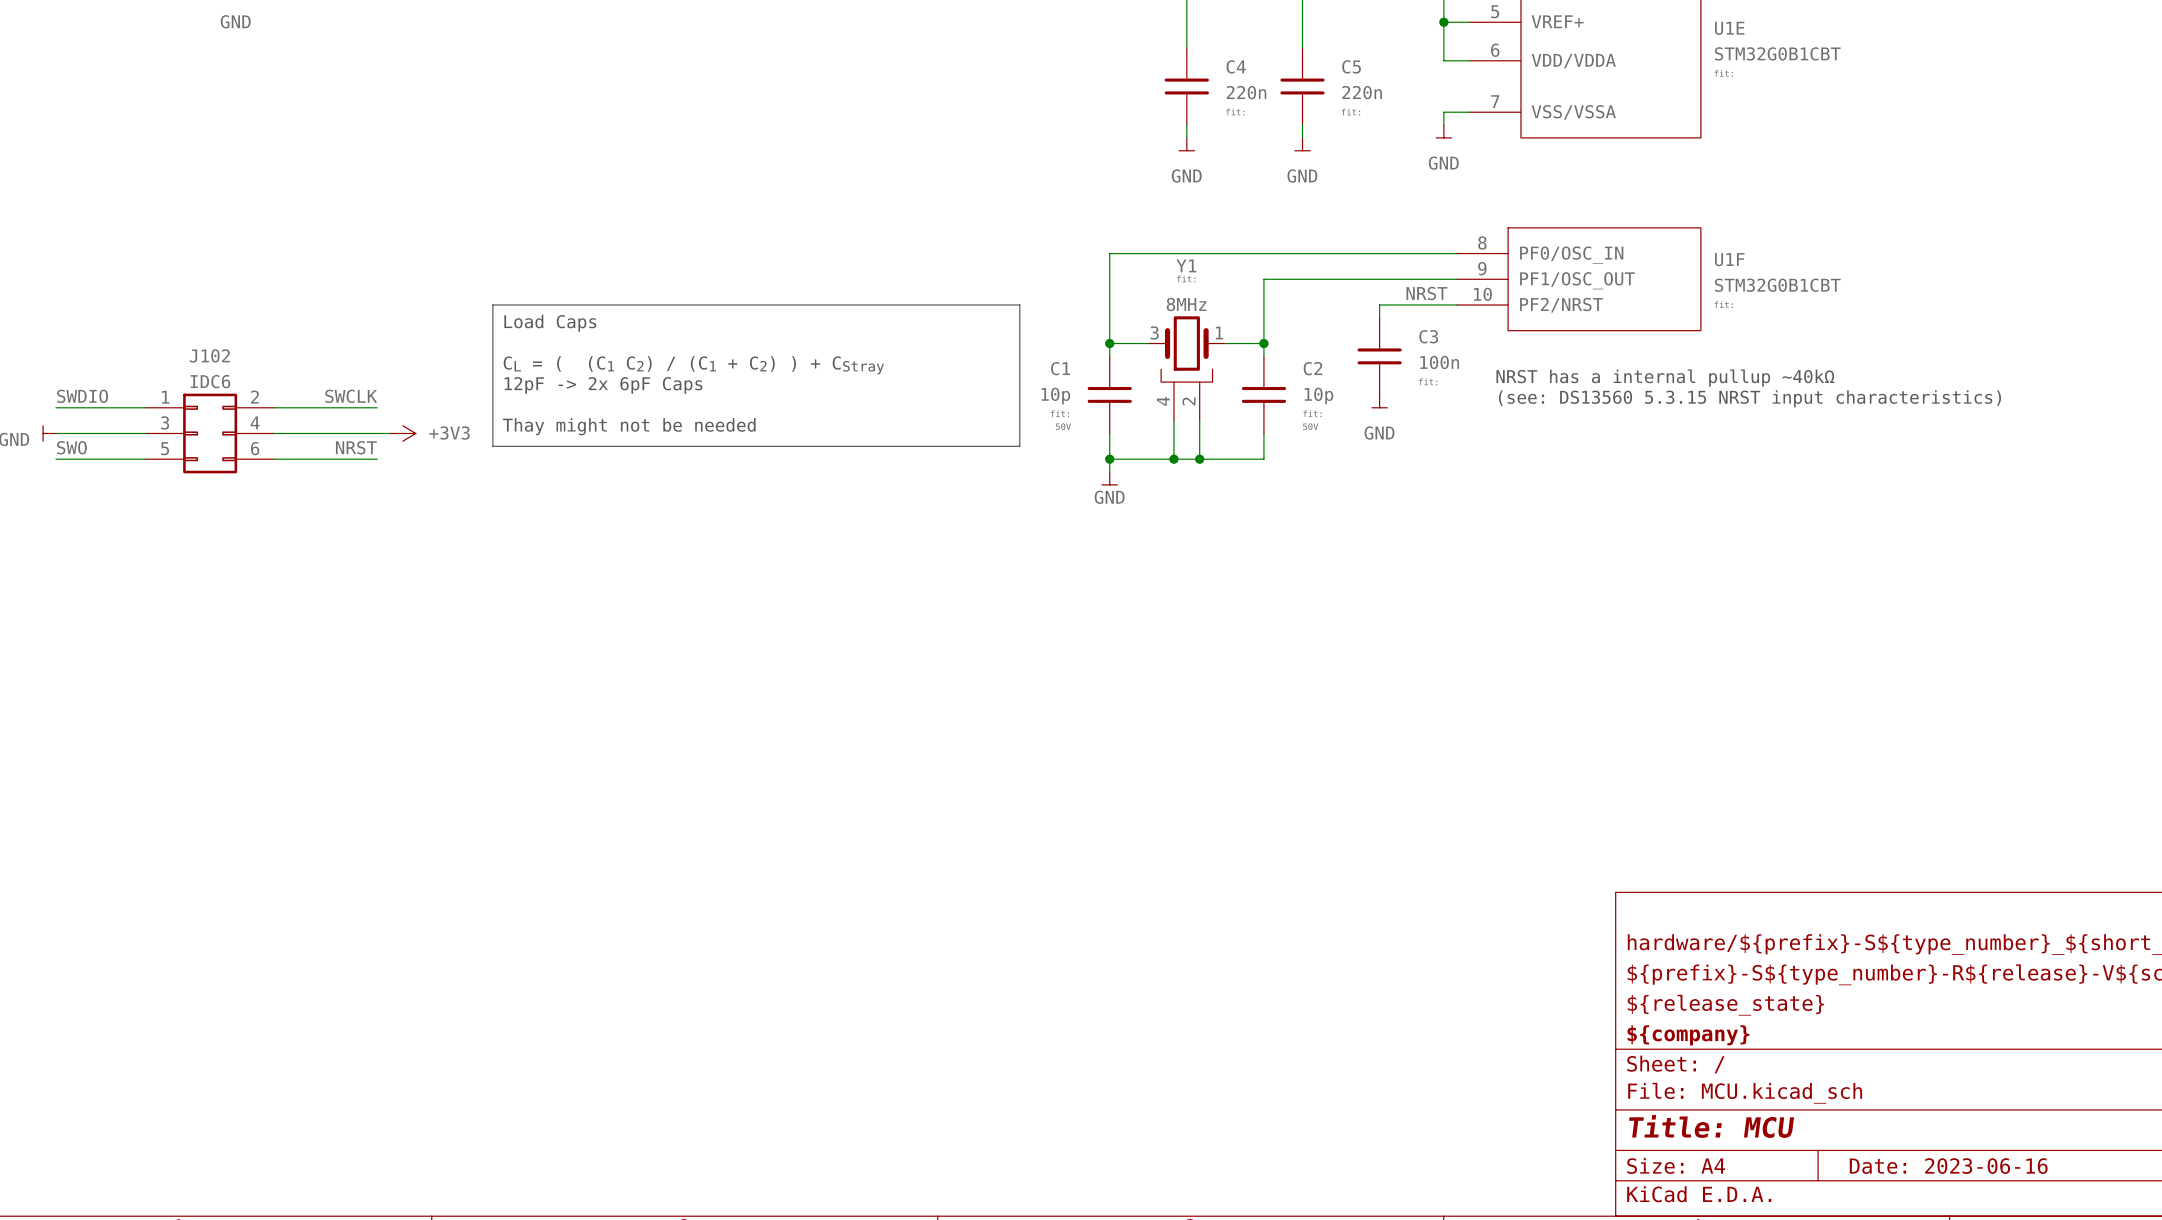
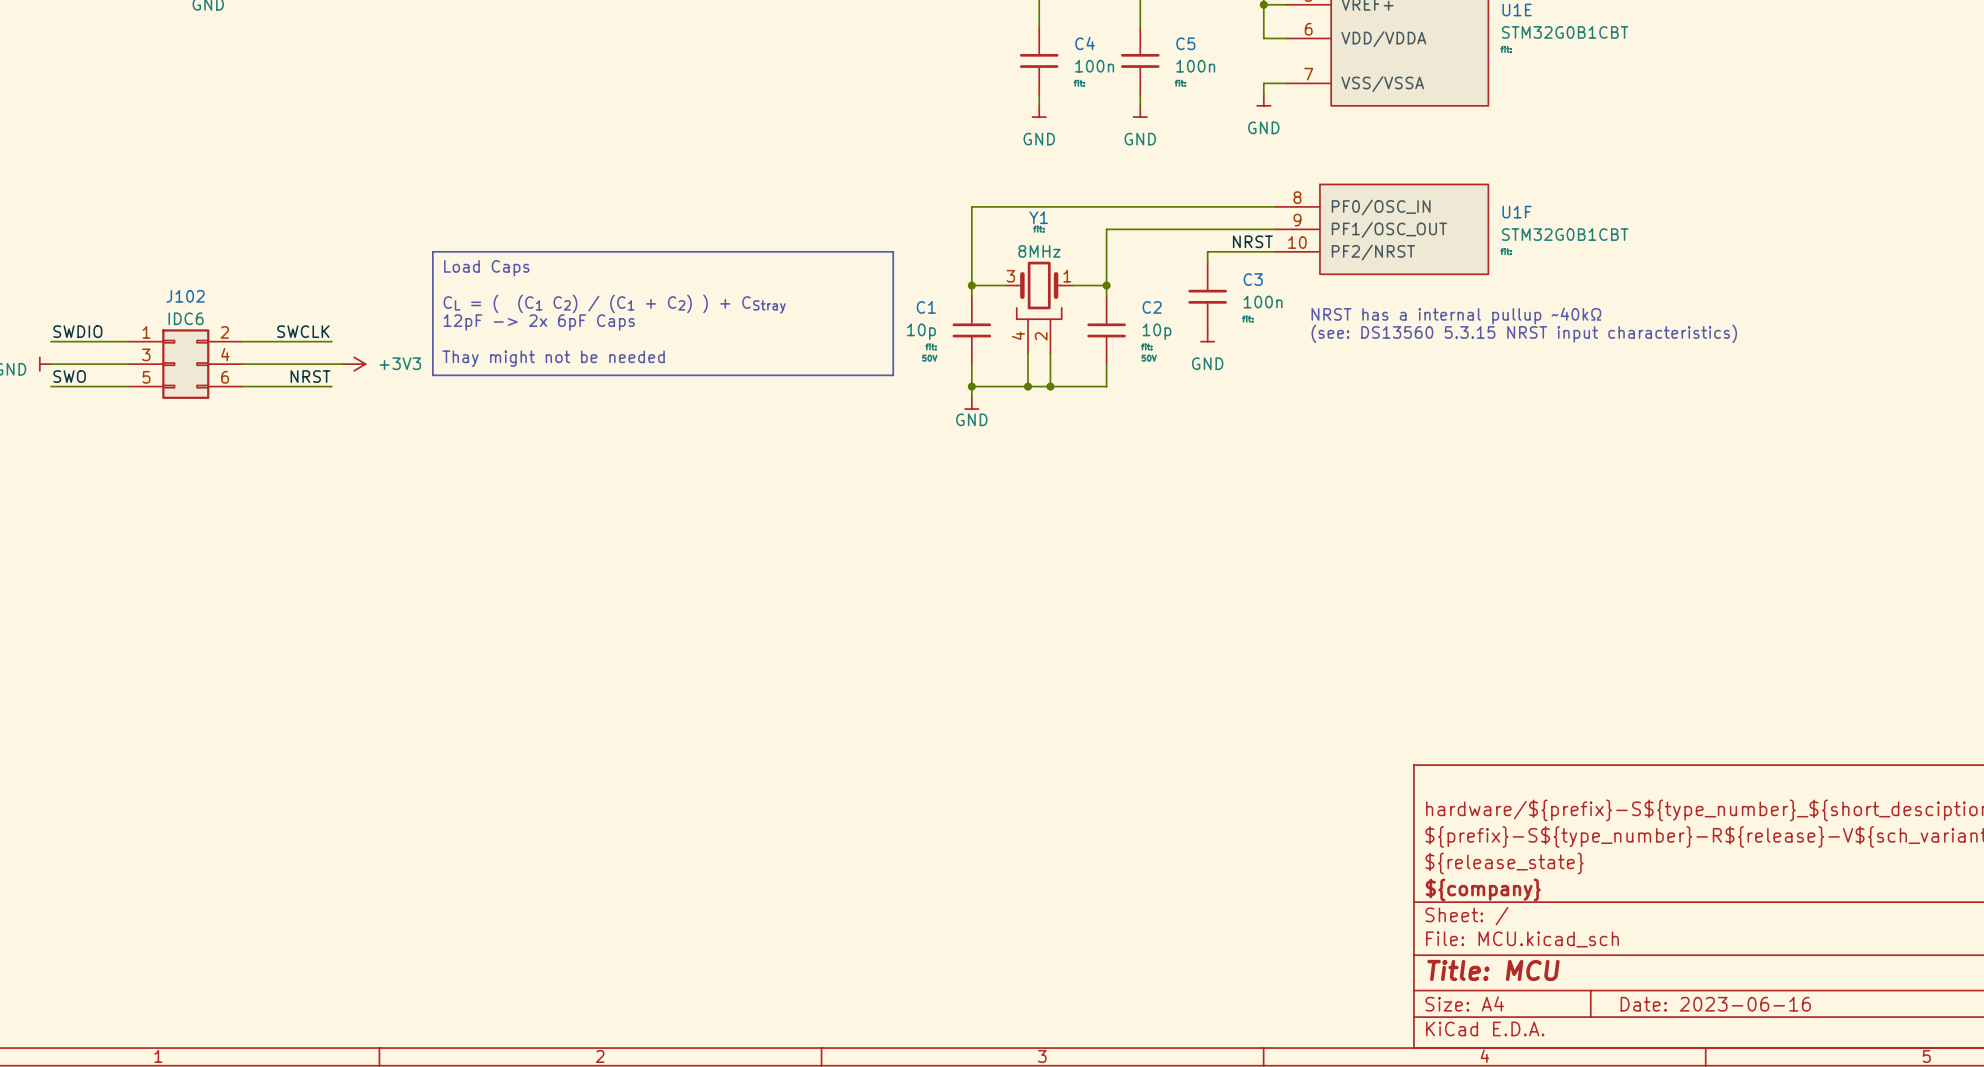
C4 value: 220n (1246, 92) -> 100n (1094, 66)
C5 value: 220n (1362, 92) -> 100n (1195, 66)

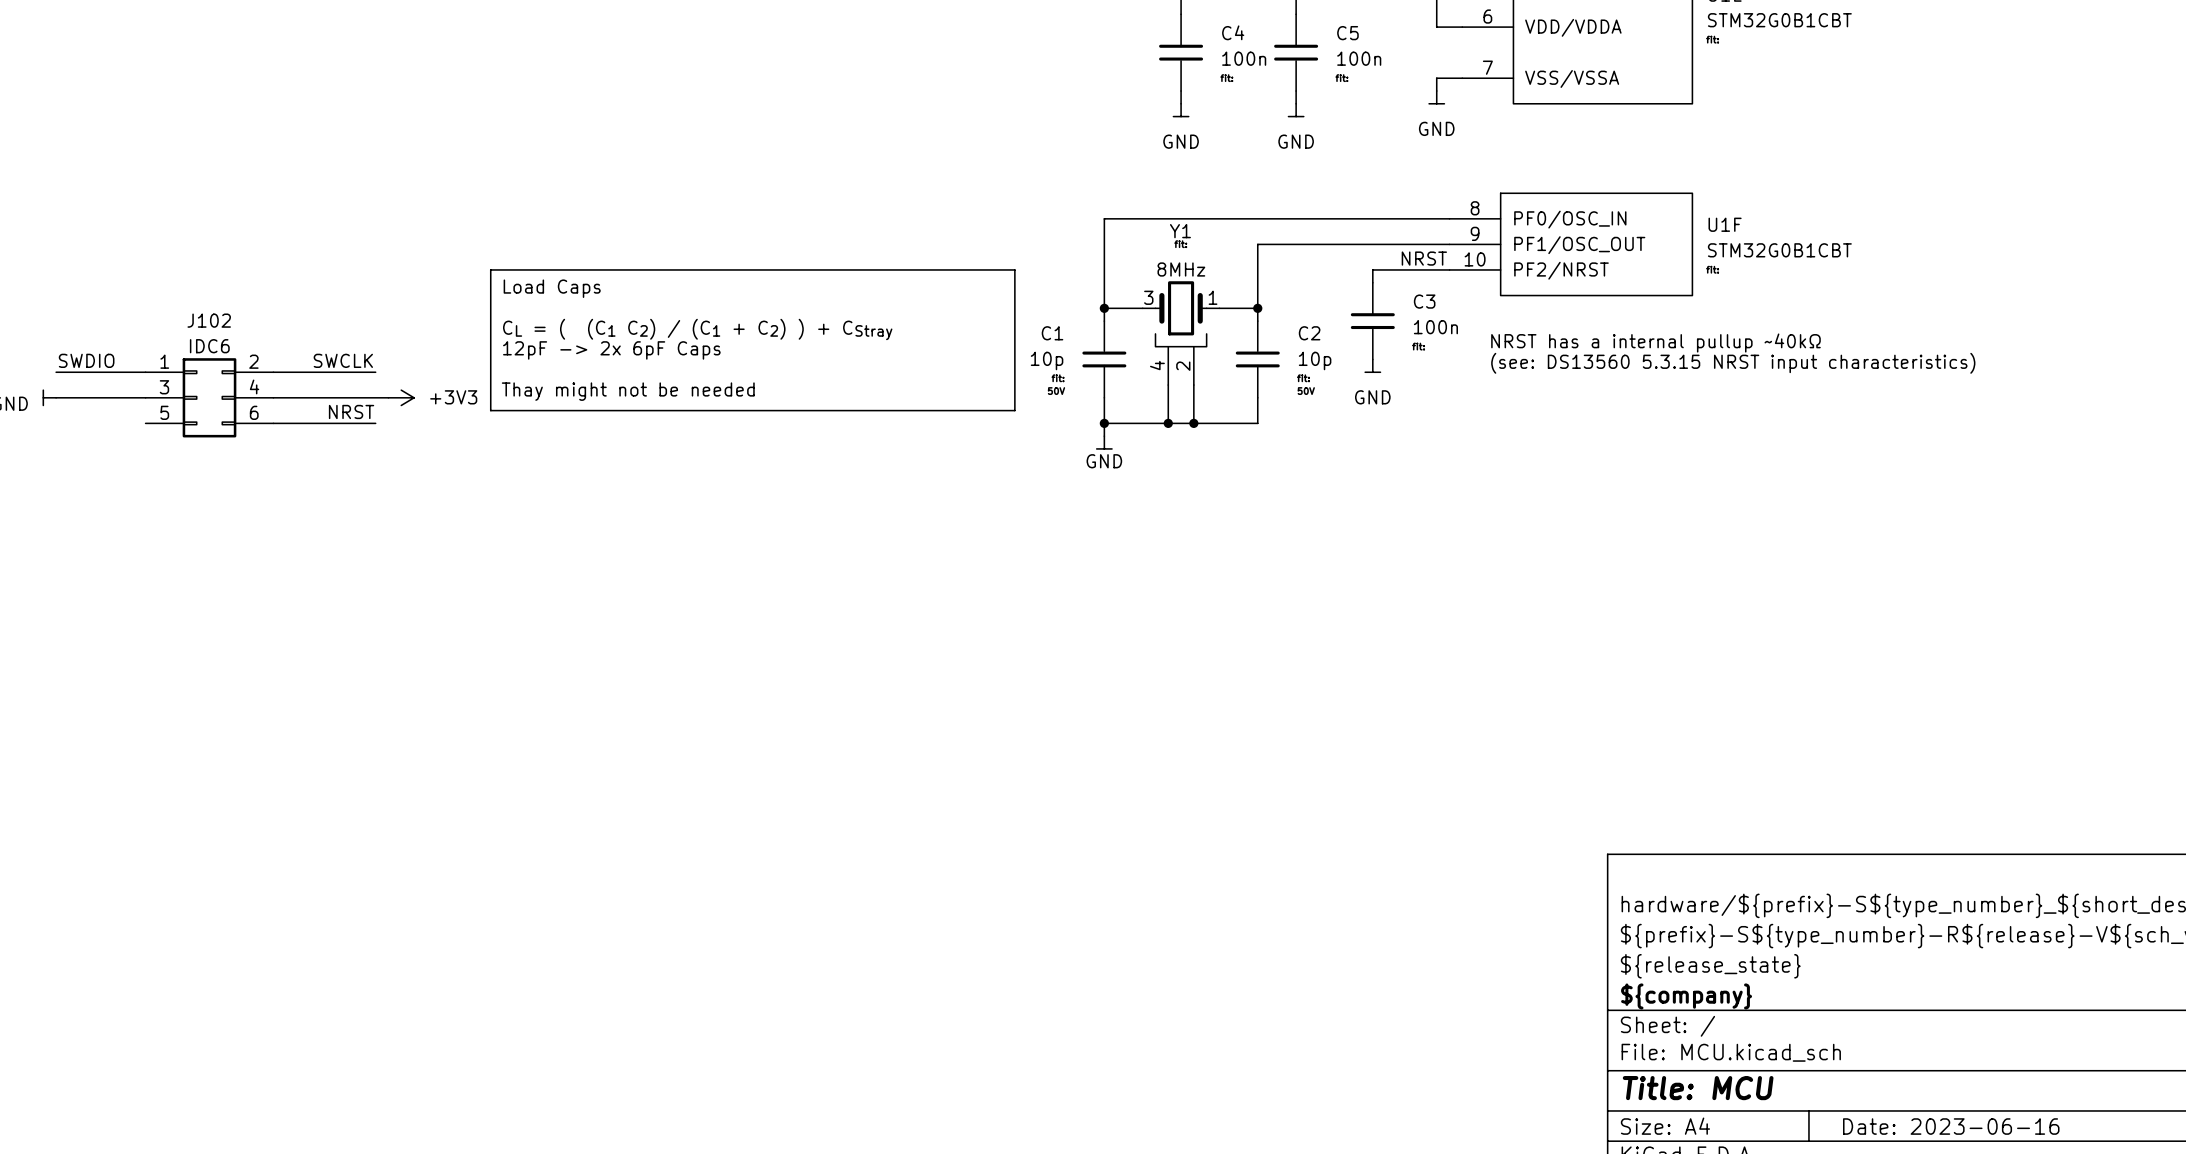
label: SWO (69, 376) -> none
wire: (51, 386) (129, 386) -> none

